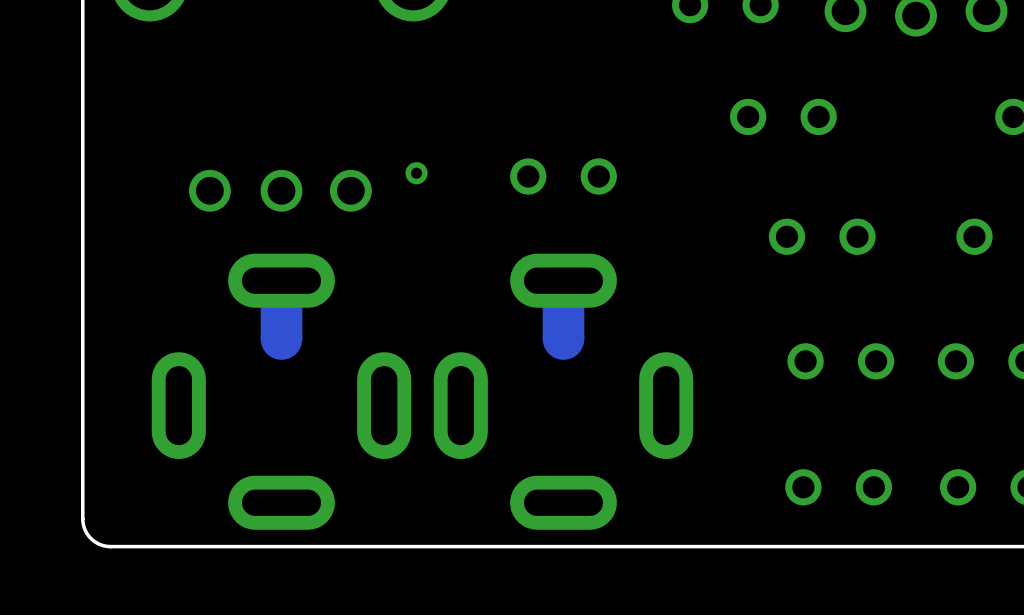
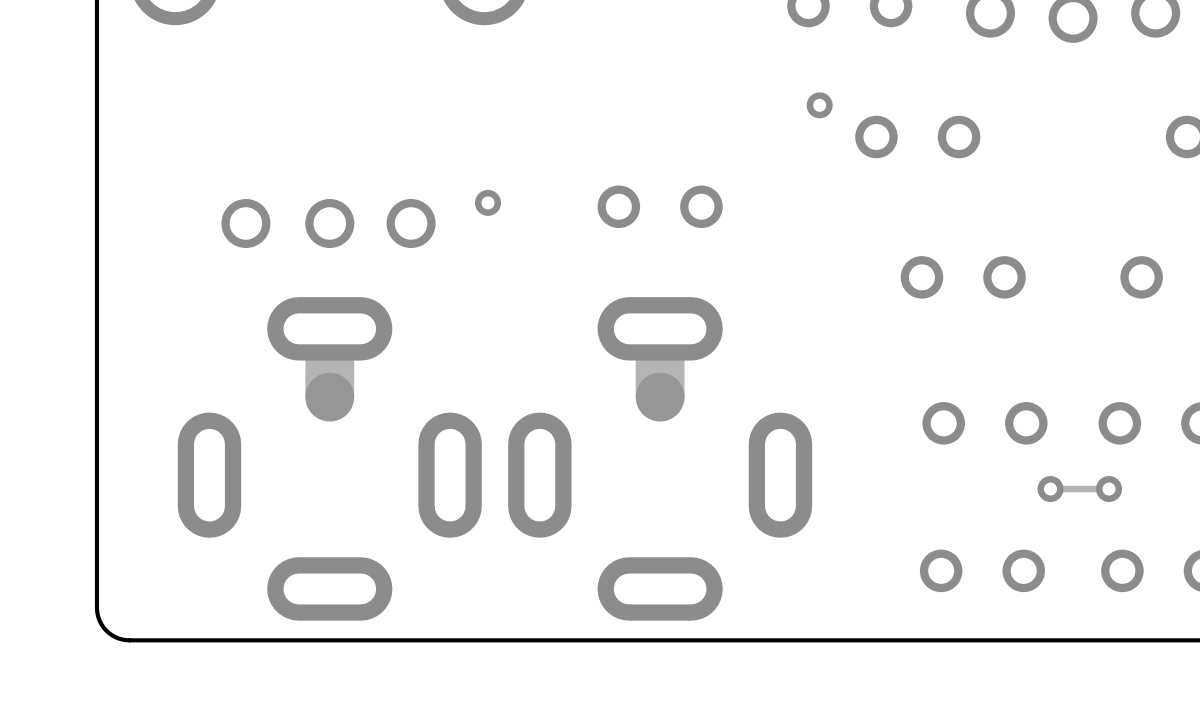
via: none -> (819, 105)
via: none -> (1050, 489)
track: none -> (1109, 489) (1050, 489)
via: none -> (1109, 489)

